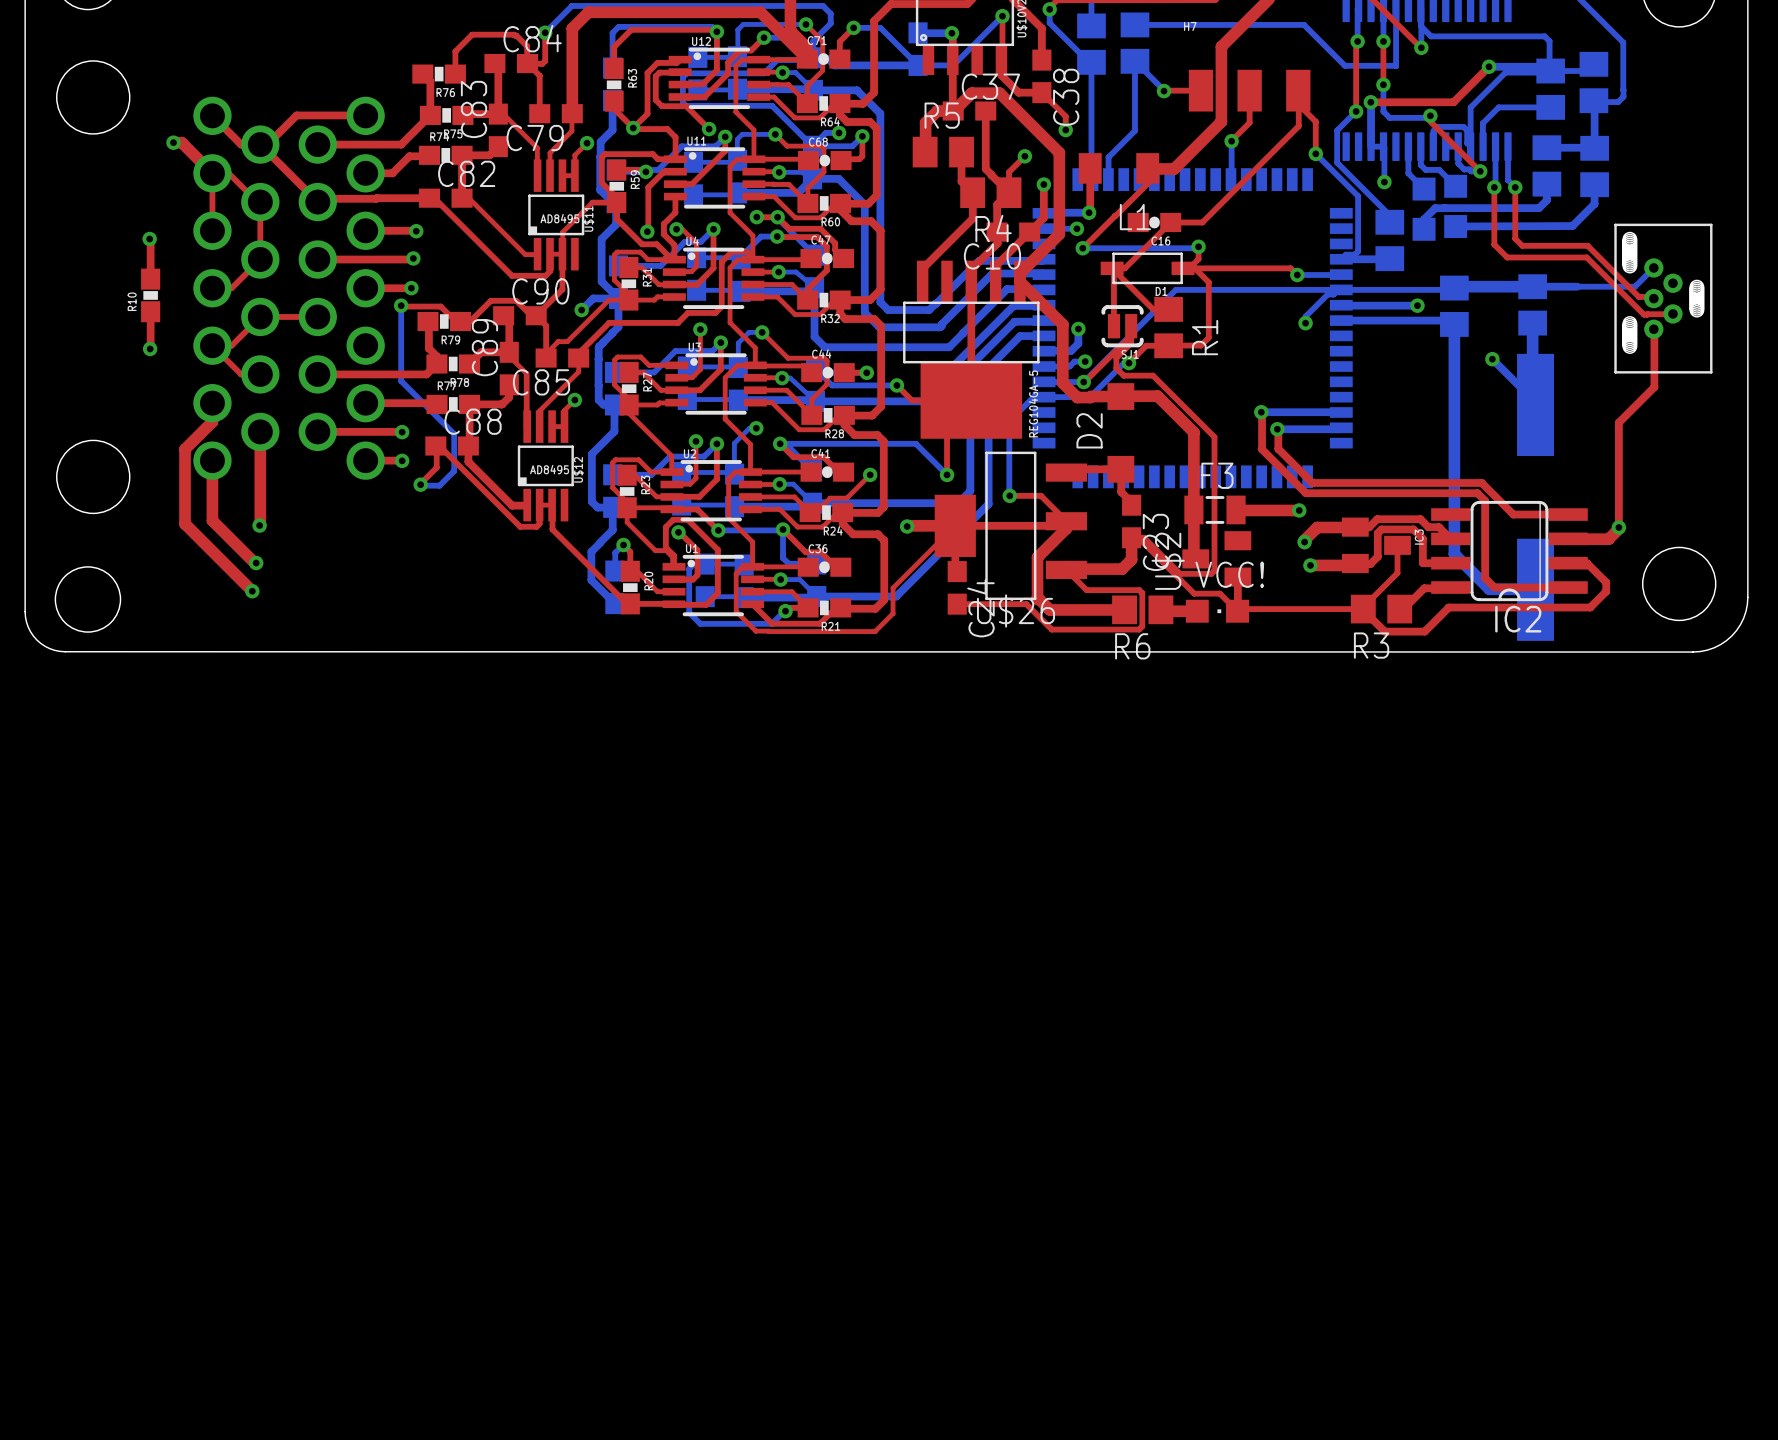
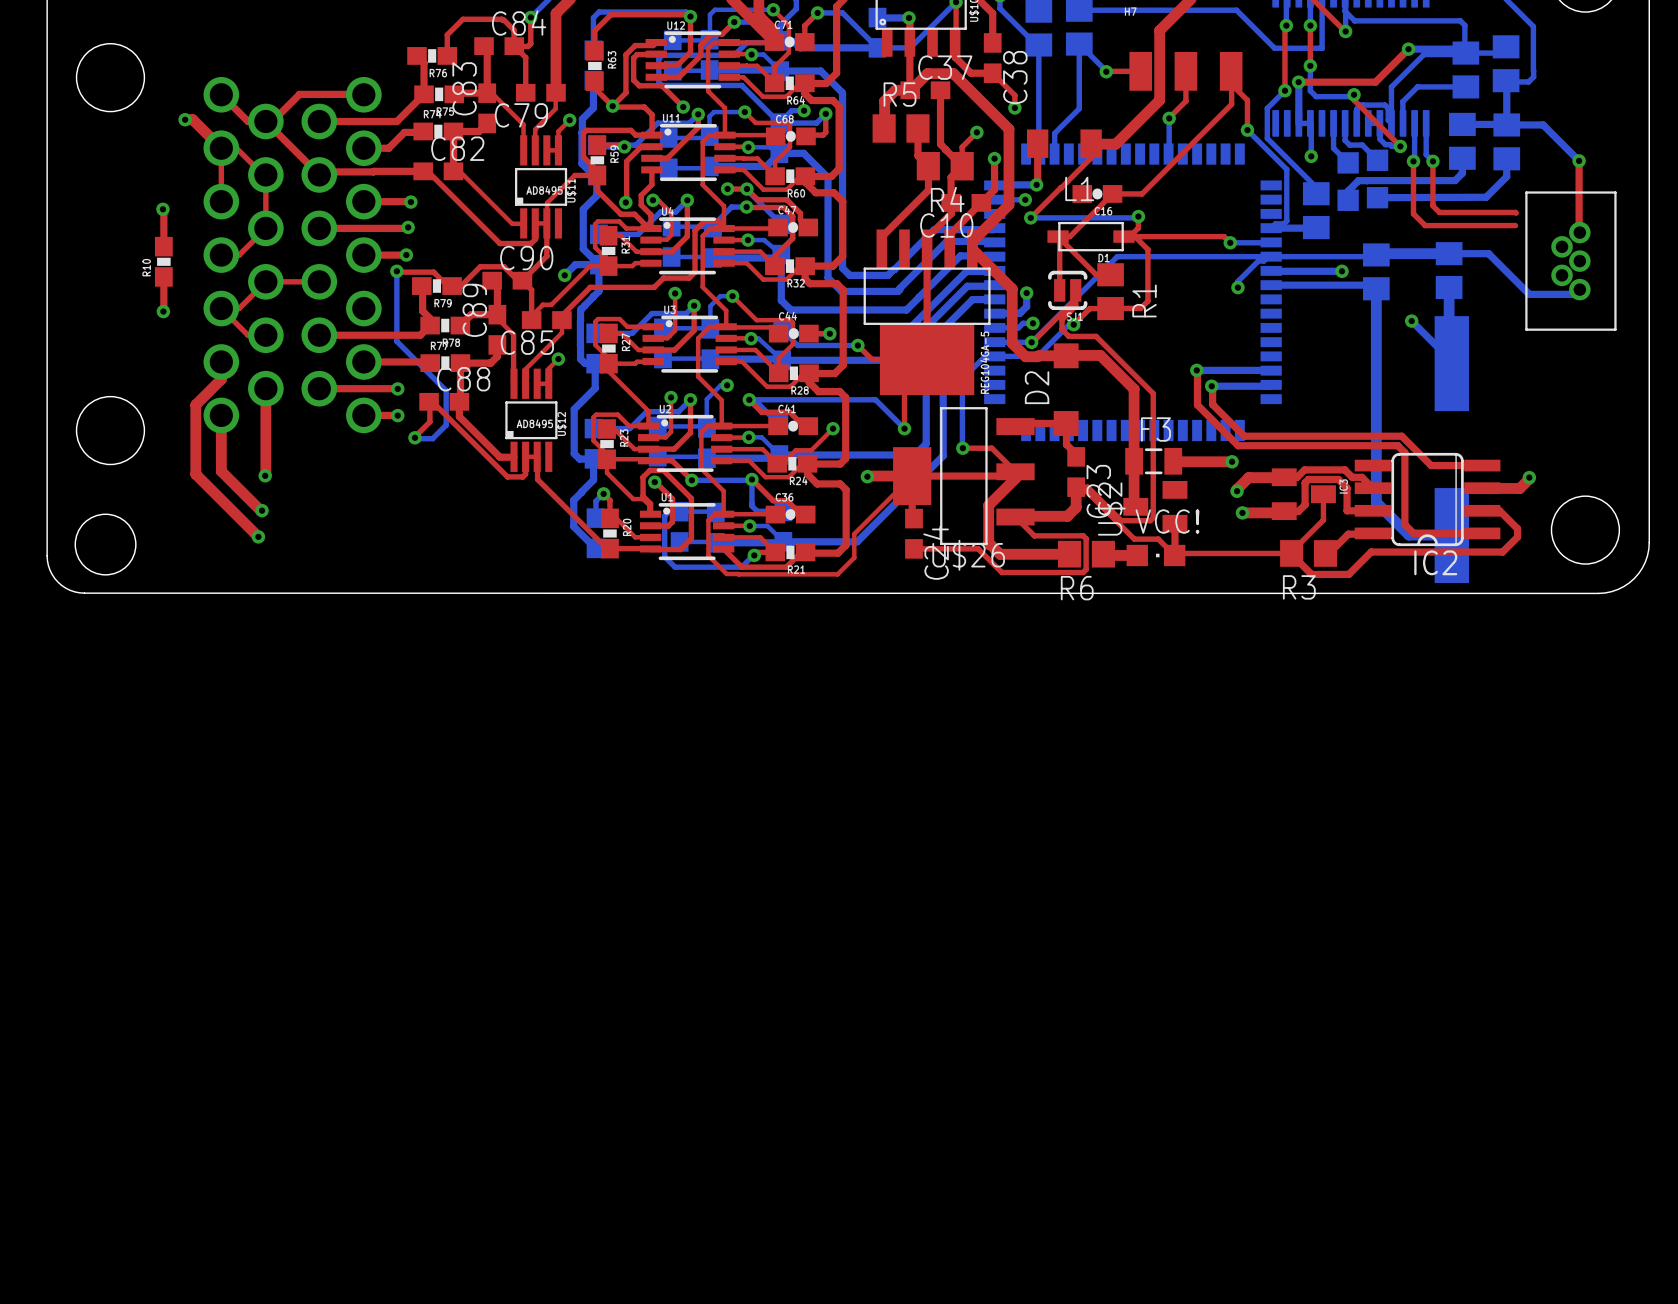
bottom track: none -> (1506, 124) (1543, 124) (1579, 160)
top track: none -> (1579, 160) (1579, 232)
via: none -> (1579, 160)
part footprint: [1614, 223, 1713, 374] -> [1525, 191, 1617, 331]
top track: (1515, 235) (1515, 238) (1522, 245) (1587, 245) (1638, 296) (1653, 298) -> (1432, 205) (1439, 212) (1516, 213)
top track: (1494, 243) (1507, 257) (1586, 257) (1643, 314) (1672, 313) -> (1413, 213) (1425, 225) (1515, 225)
bottom track: (1653, 267) (1635, 286) (1575, 286) -> (1579, 289) (1575, 294) (1529, 294) (1488, 253)
top track: (1653, 329) (1654, 387) (1618, 422) (1618, 527) -> none

